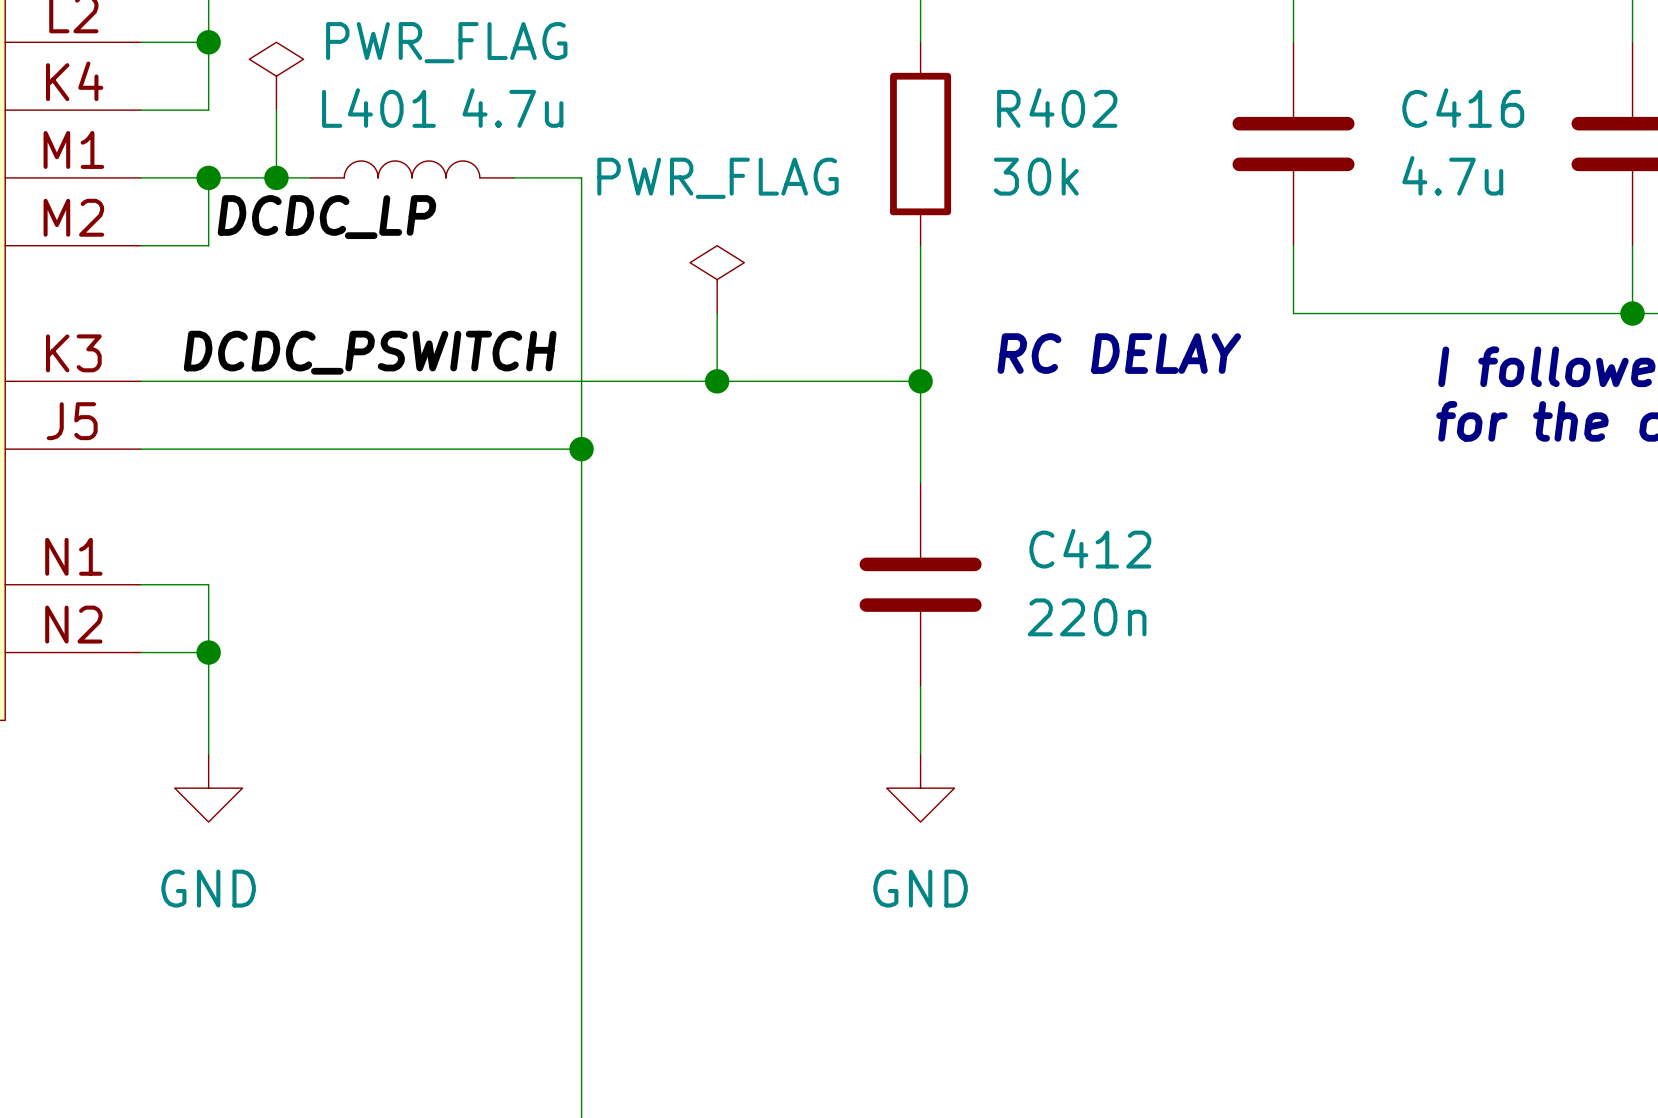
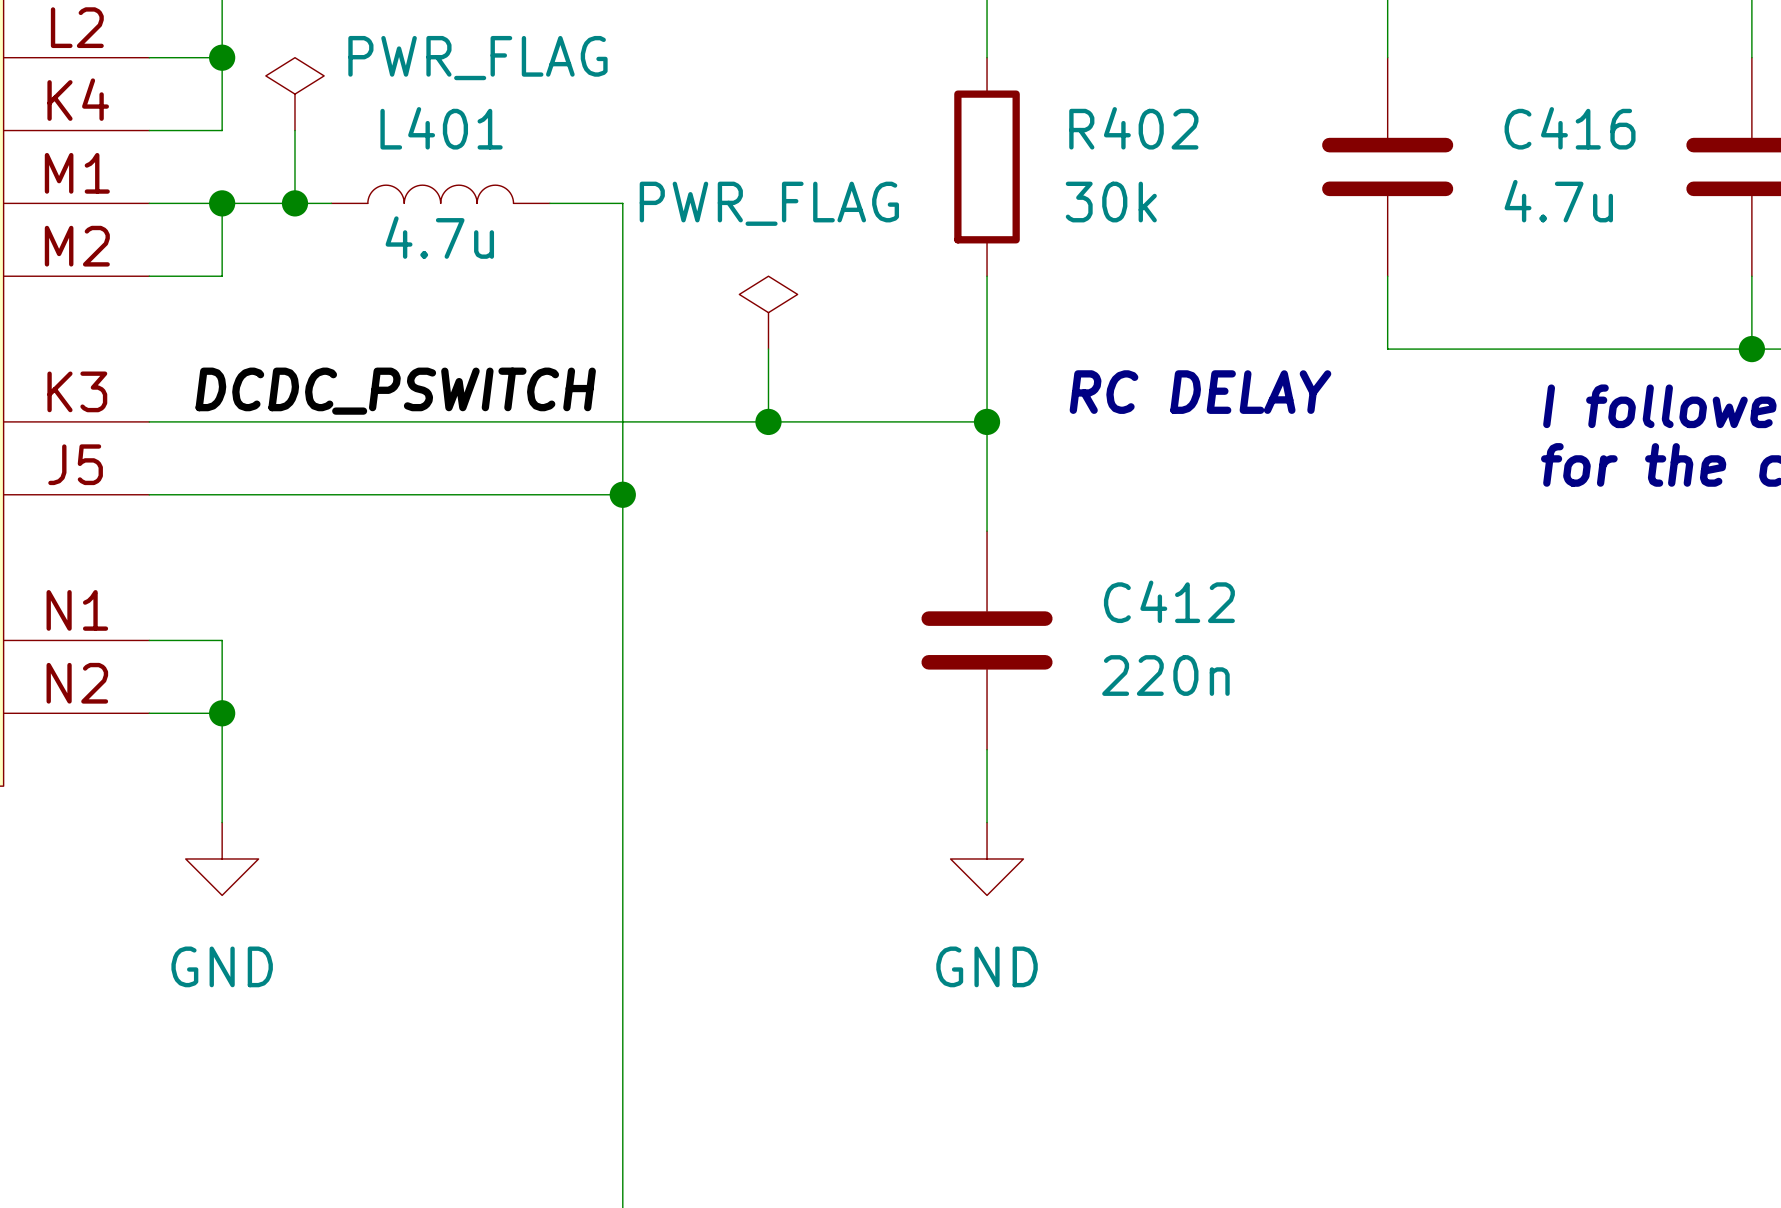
L401 name position: L401 (378, 108) -> L401 (441, 128)
L401 value position: 4.7u (512, 108) -> 4.7u (439, 237)
label: DCDC_LP (327, 217) -> none

